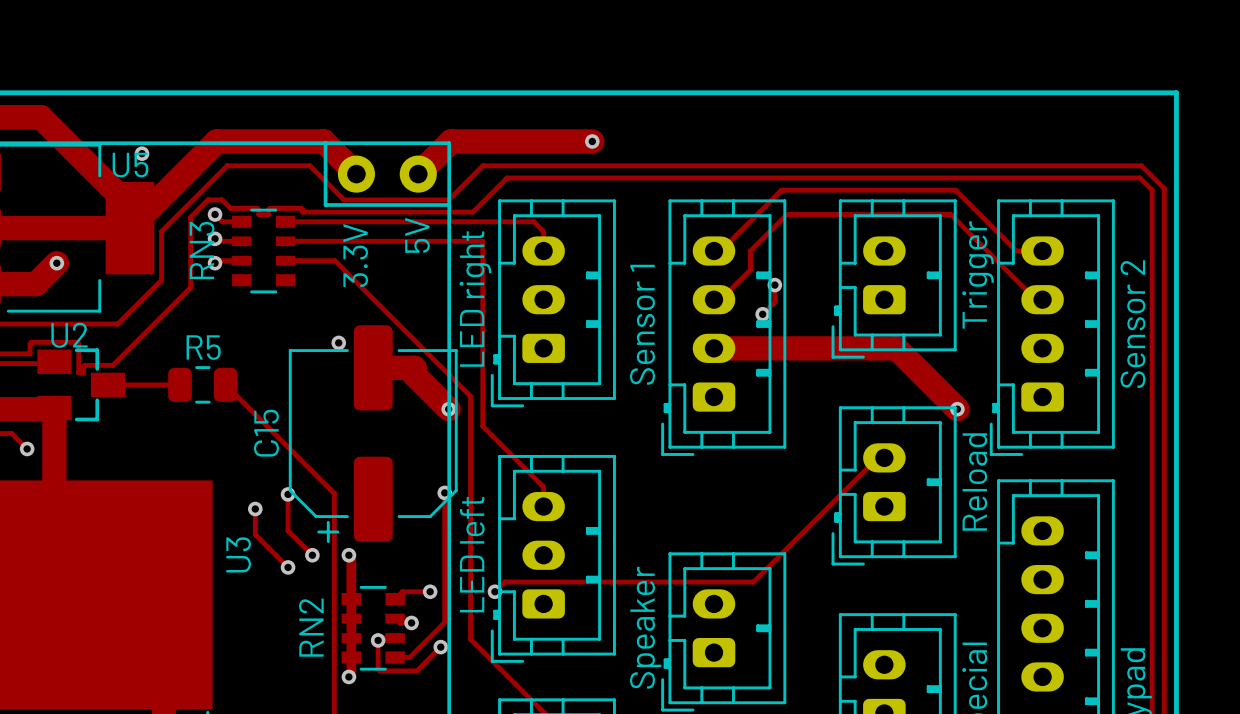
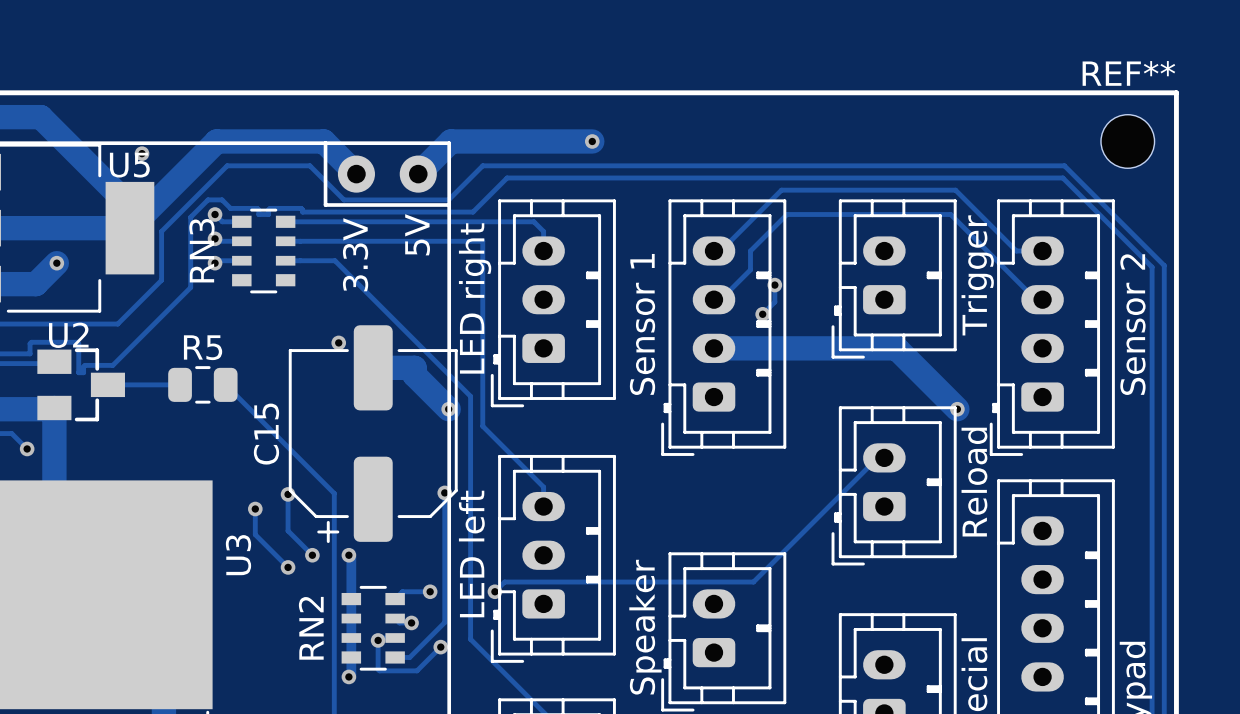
REF**: none -> (1127, 141)
track: (1064, 165) (1141, 165) (1164, 188) (1164, 265) -> (1064, 165) (1164, 265)
track: (1062, 177) (1139, 177) (1152, 190) (1152, 267) -> (1062, 177) (1152, 267)

